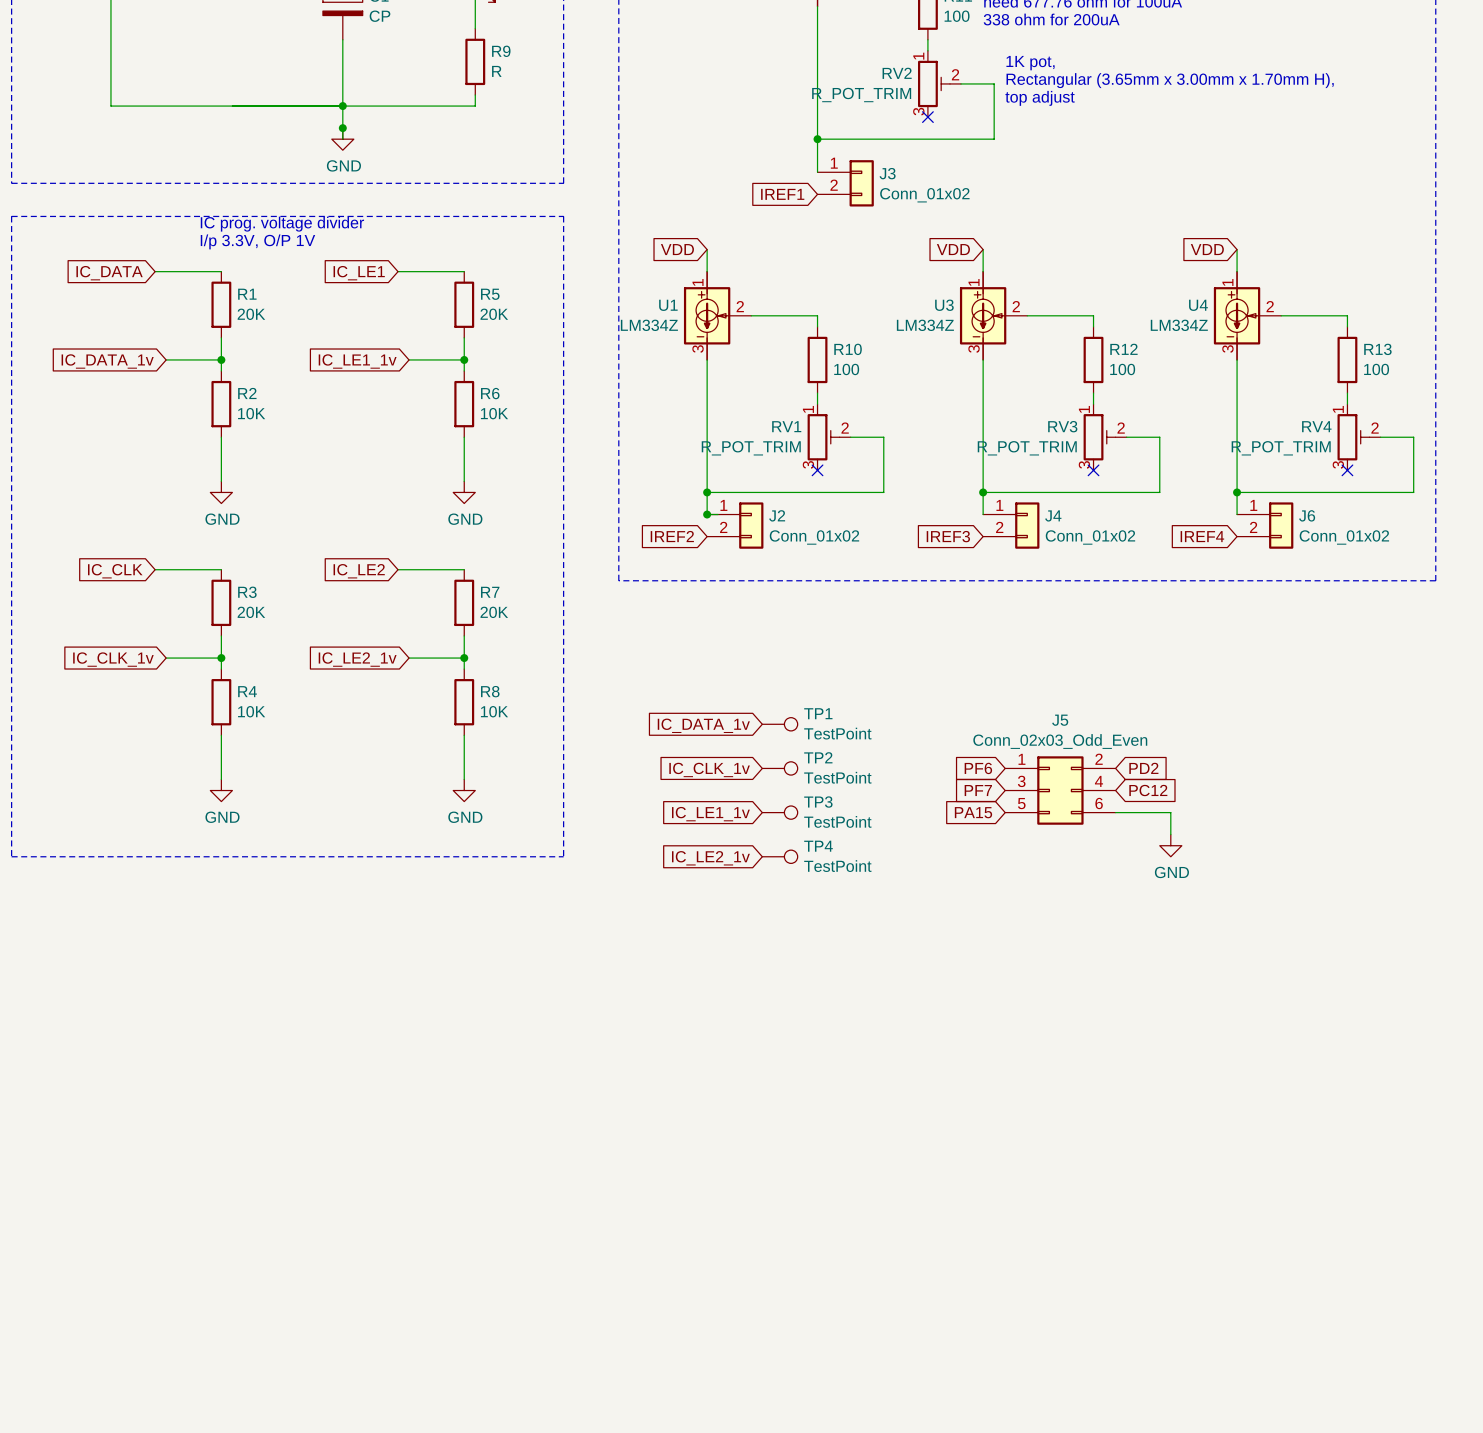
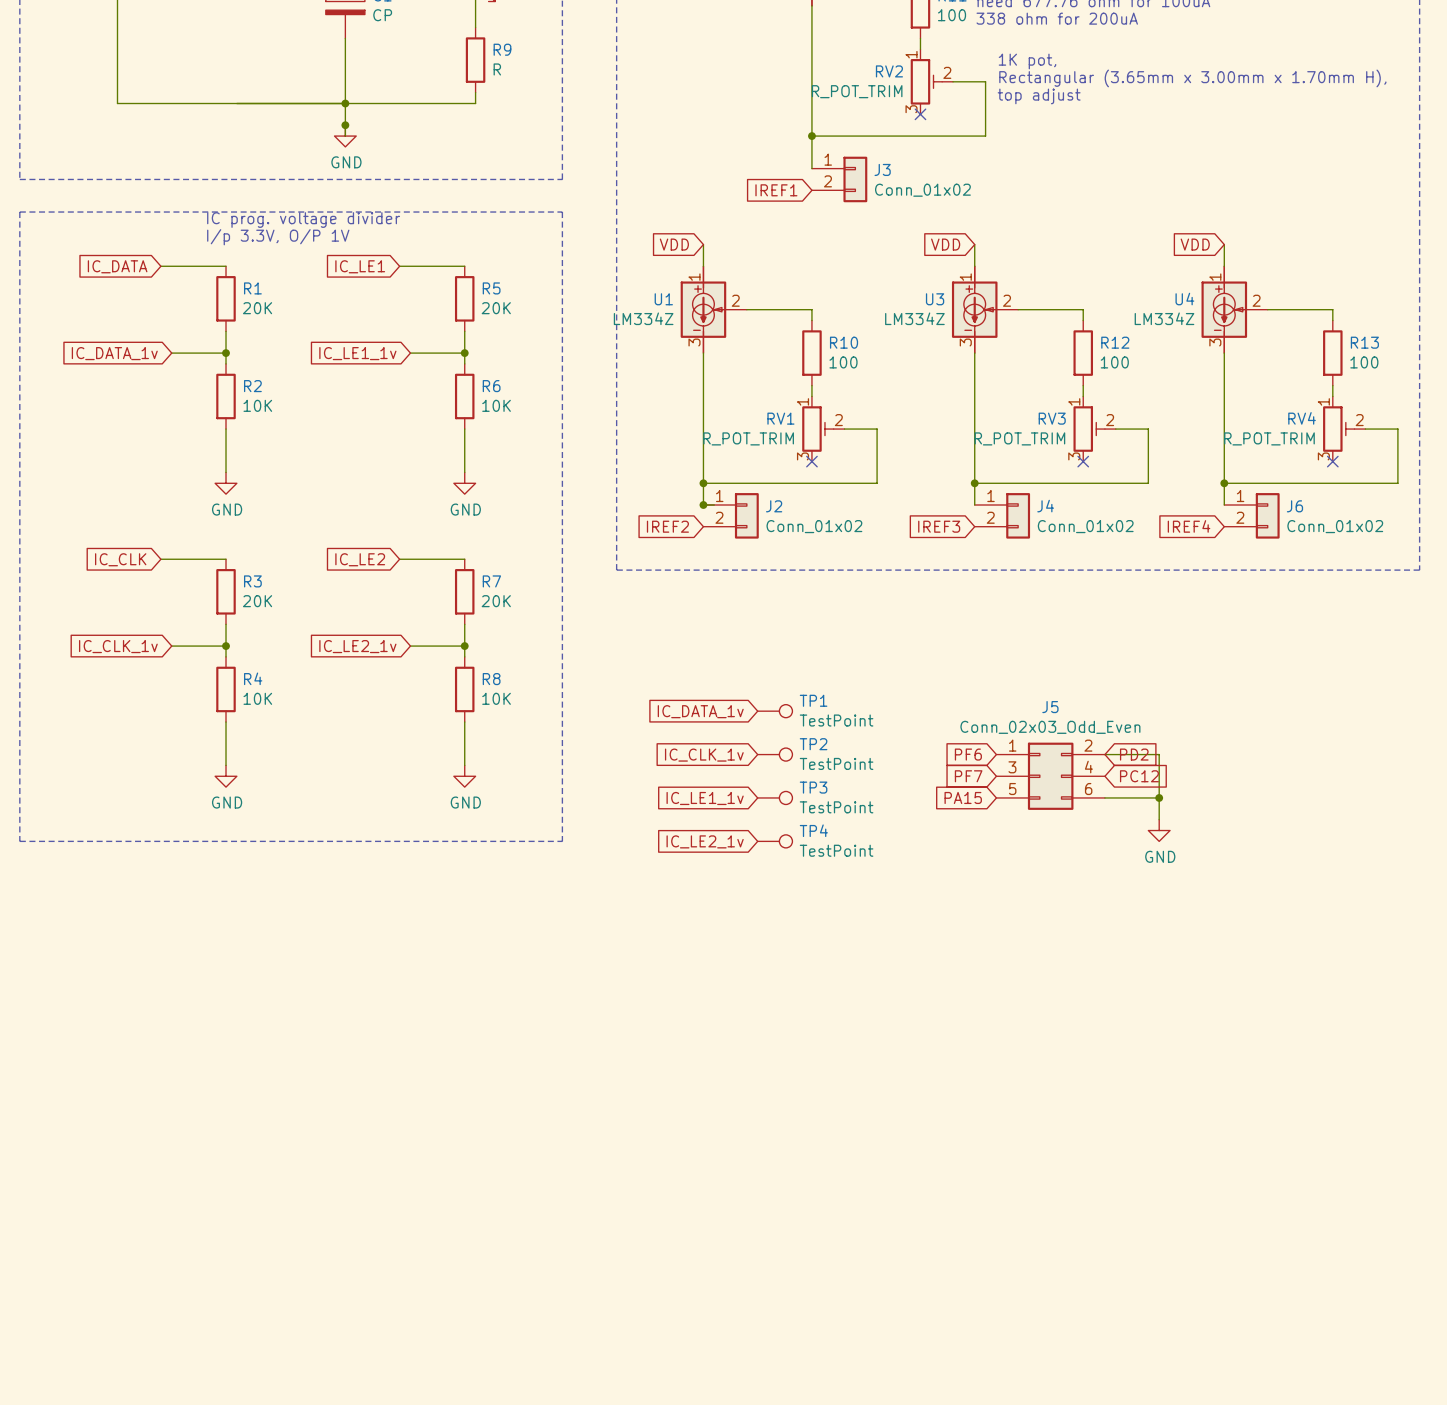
wire: none -> (1104, 754) (1159, 754) (1159, 797)
junction: none -> (1159, 797)

